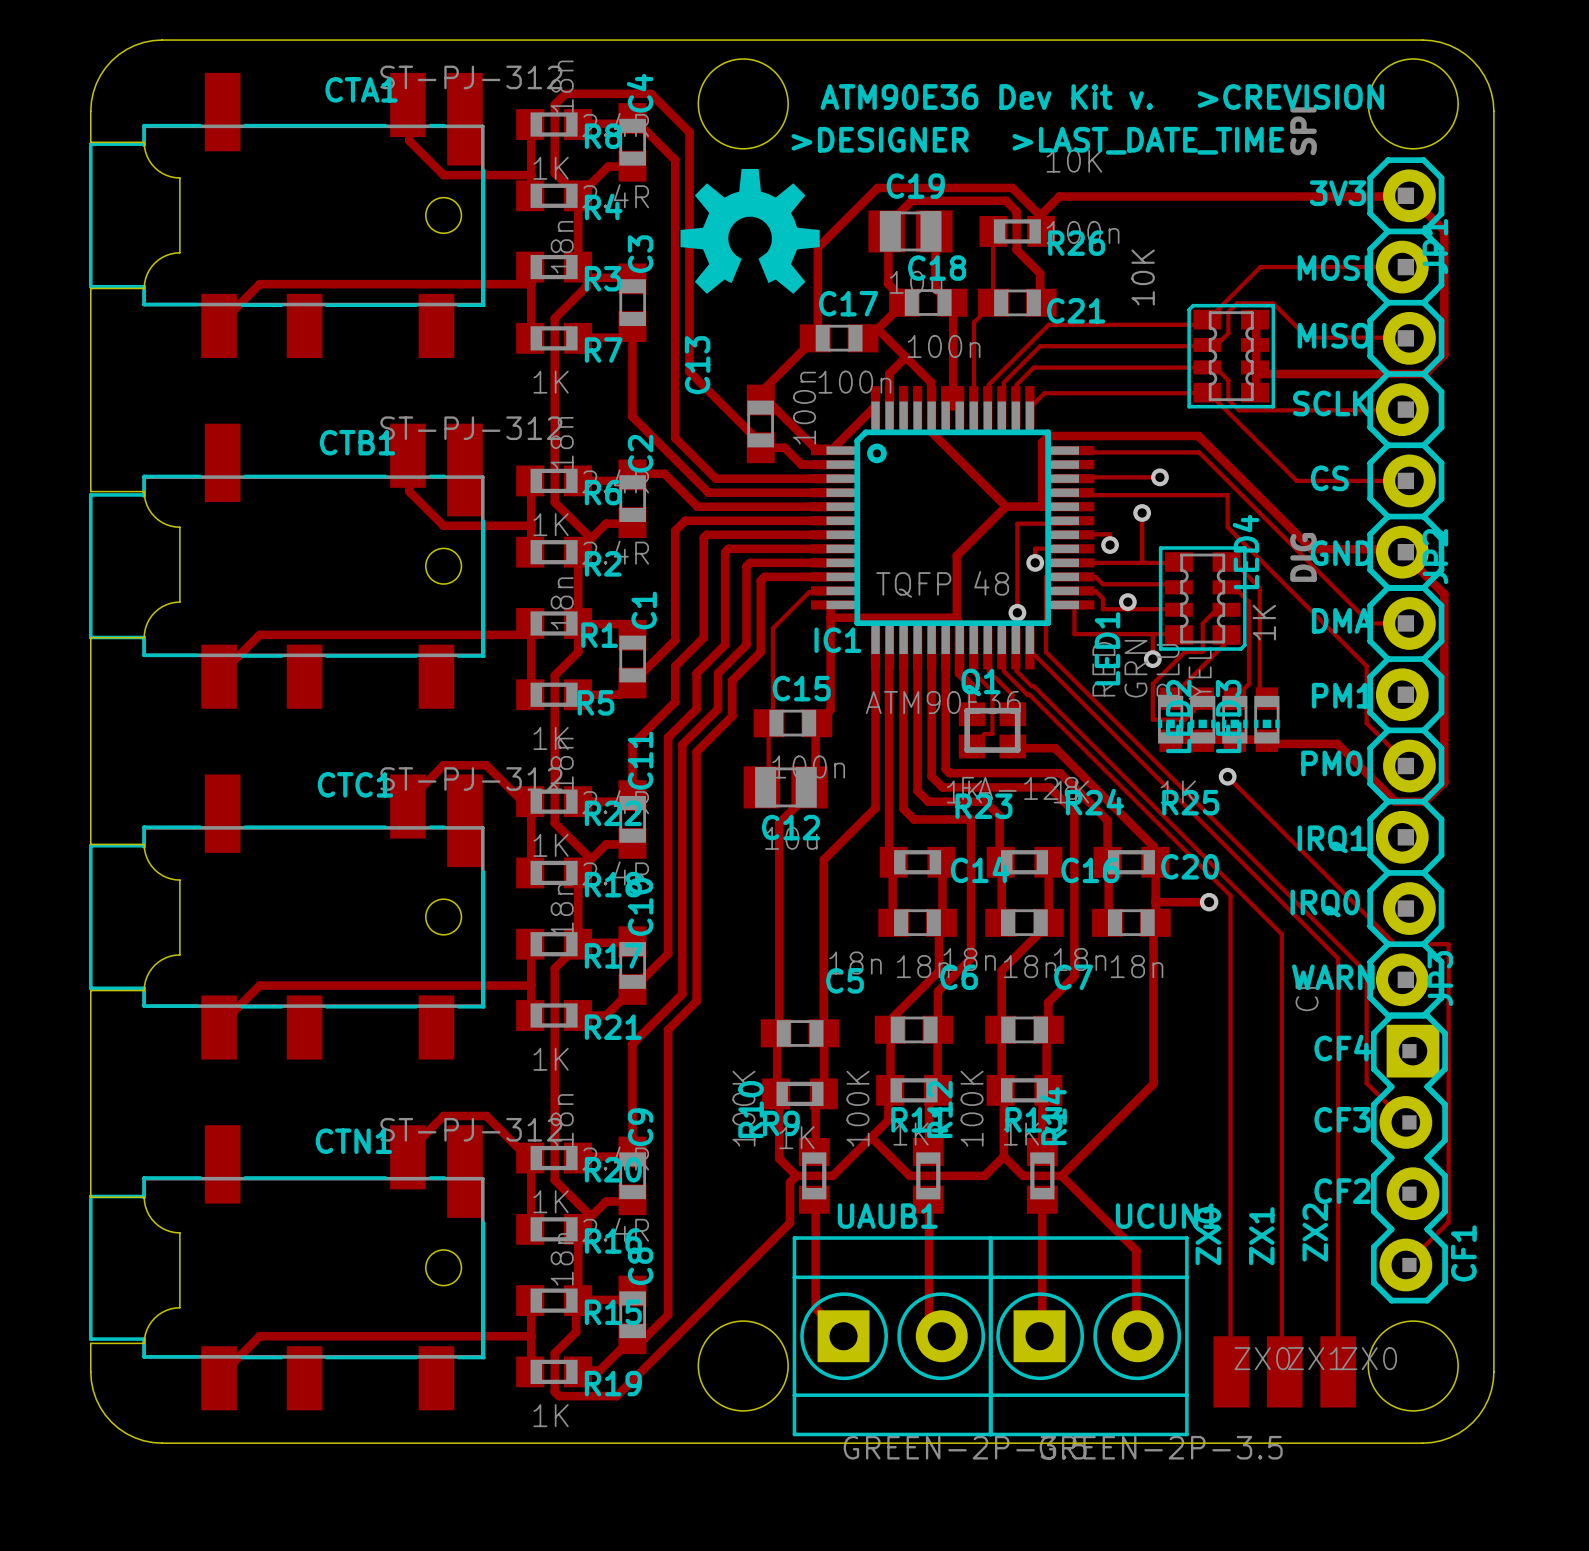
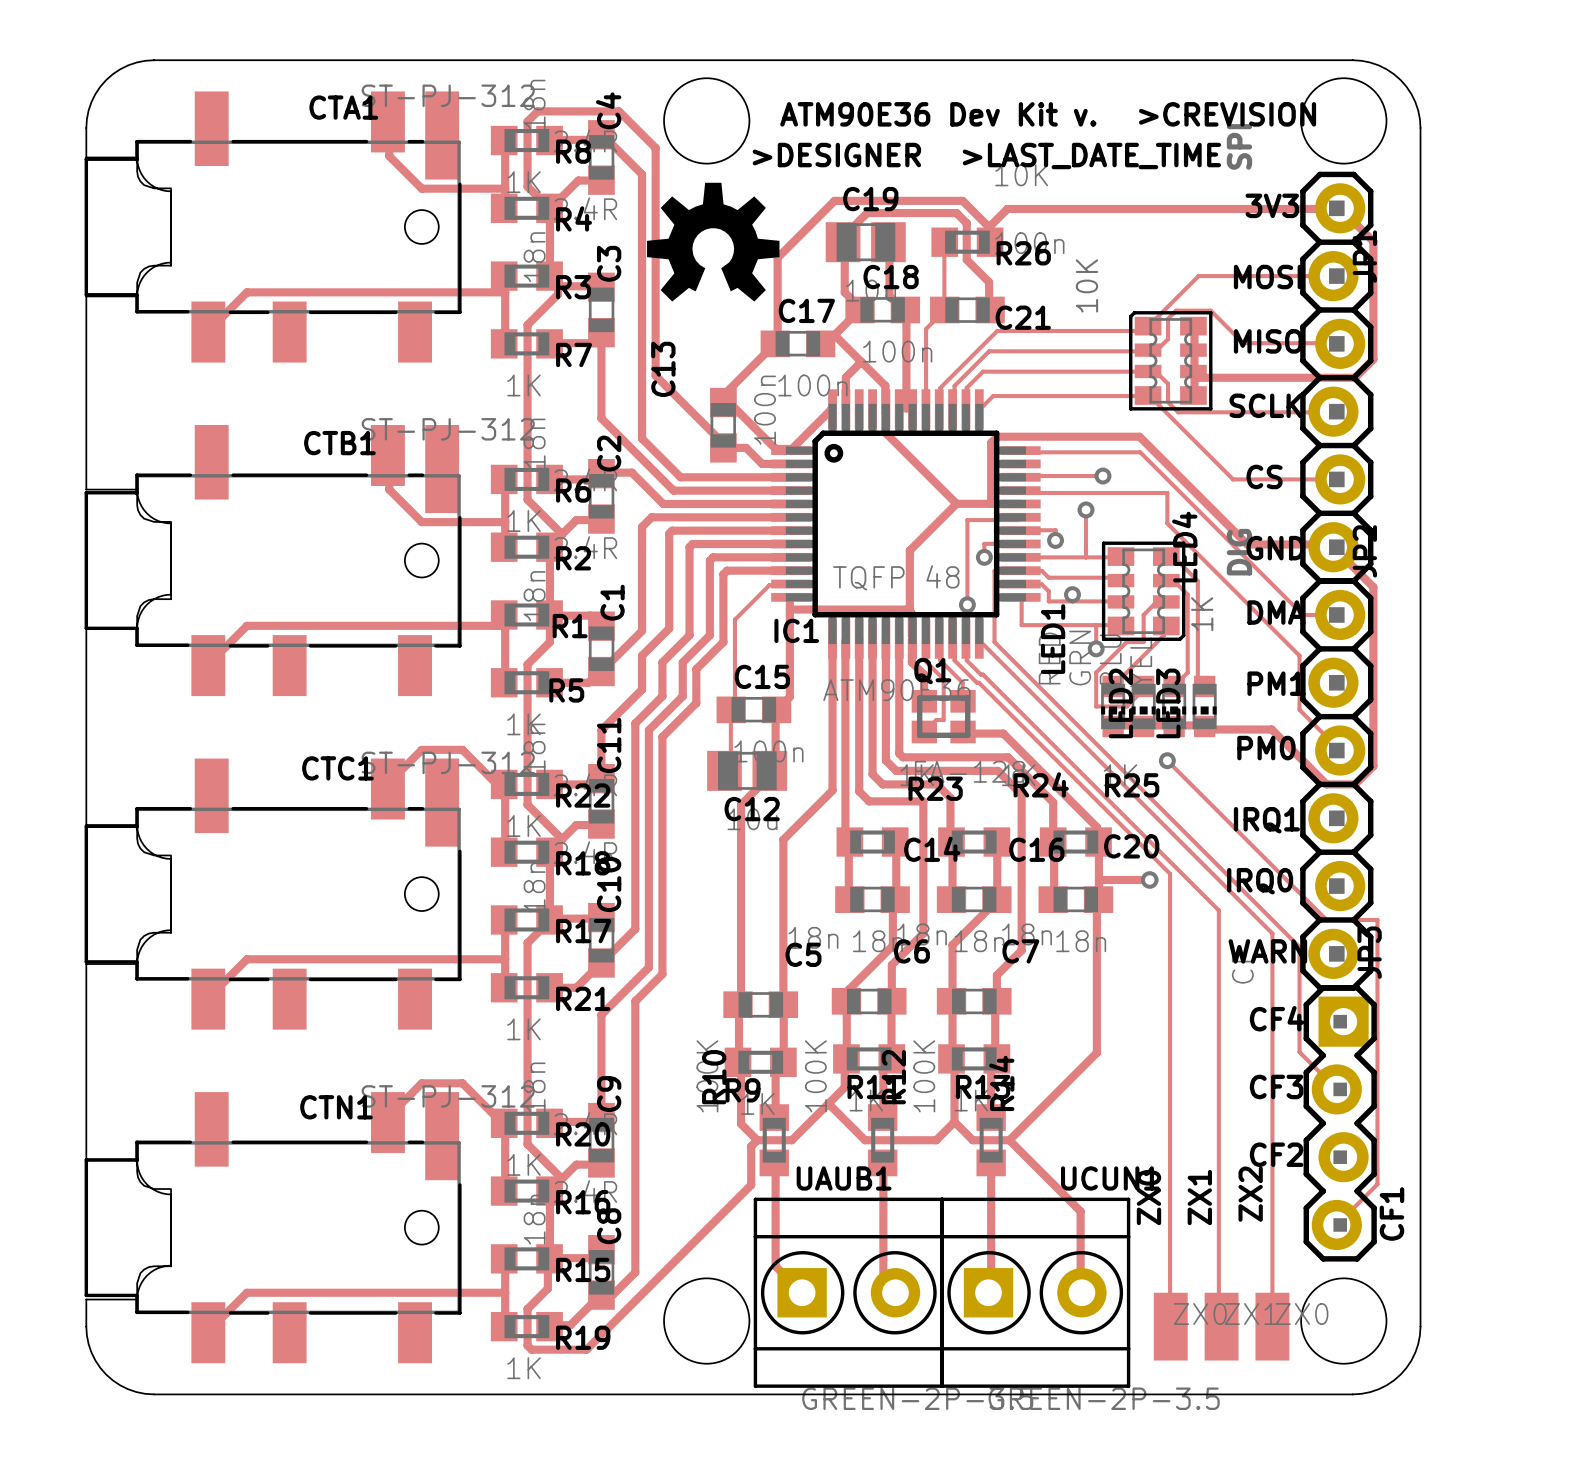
CTA1 footprint: [89, 72, 486, 359] -> [84, 91, 462, 363]
CTB1 footprint: [89, 423, 486, 709] -> [84, 424, 462, 697]
CTC1 footprint: [89, 774, 486, 1060] -> [84, 758, 462, 1030]
CTN1 footprint: [89, 1125, 486, 1411] -> [84, 1092, 462, 1364]

